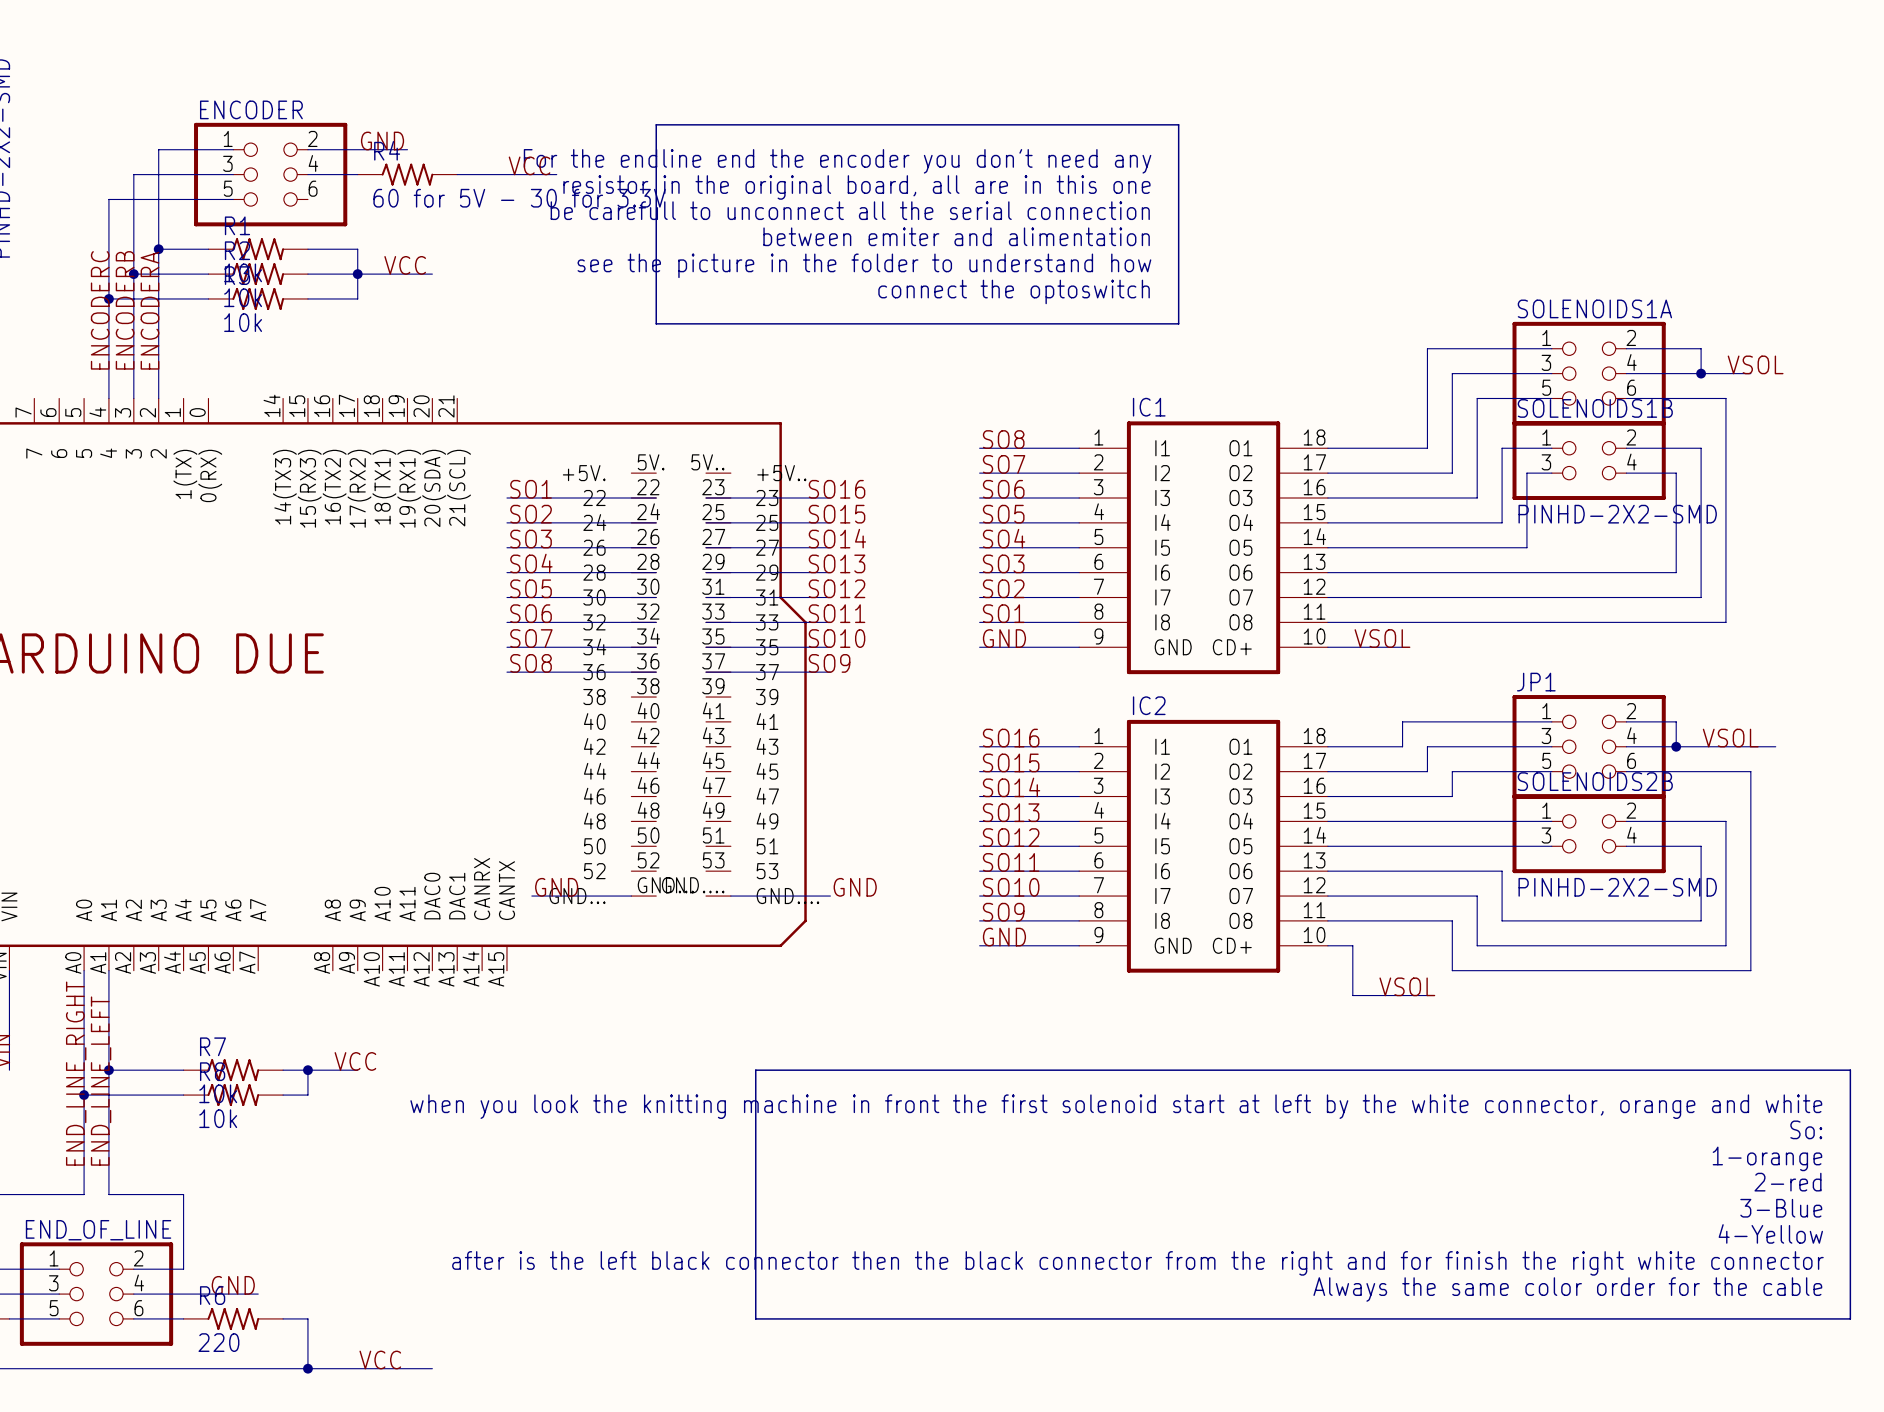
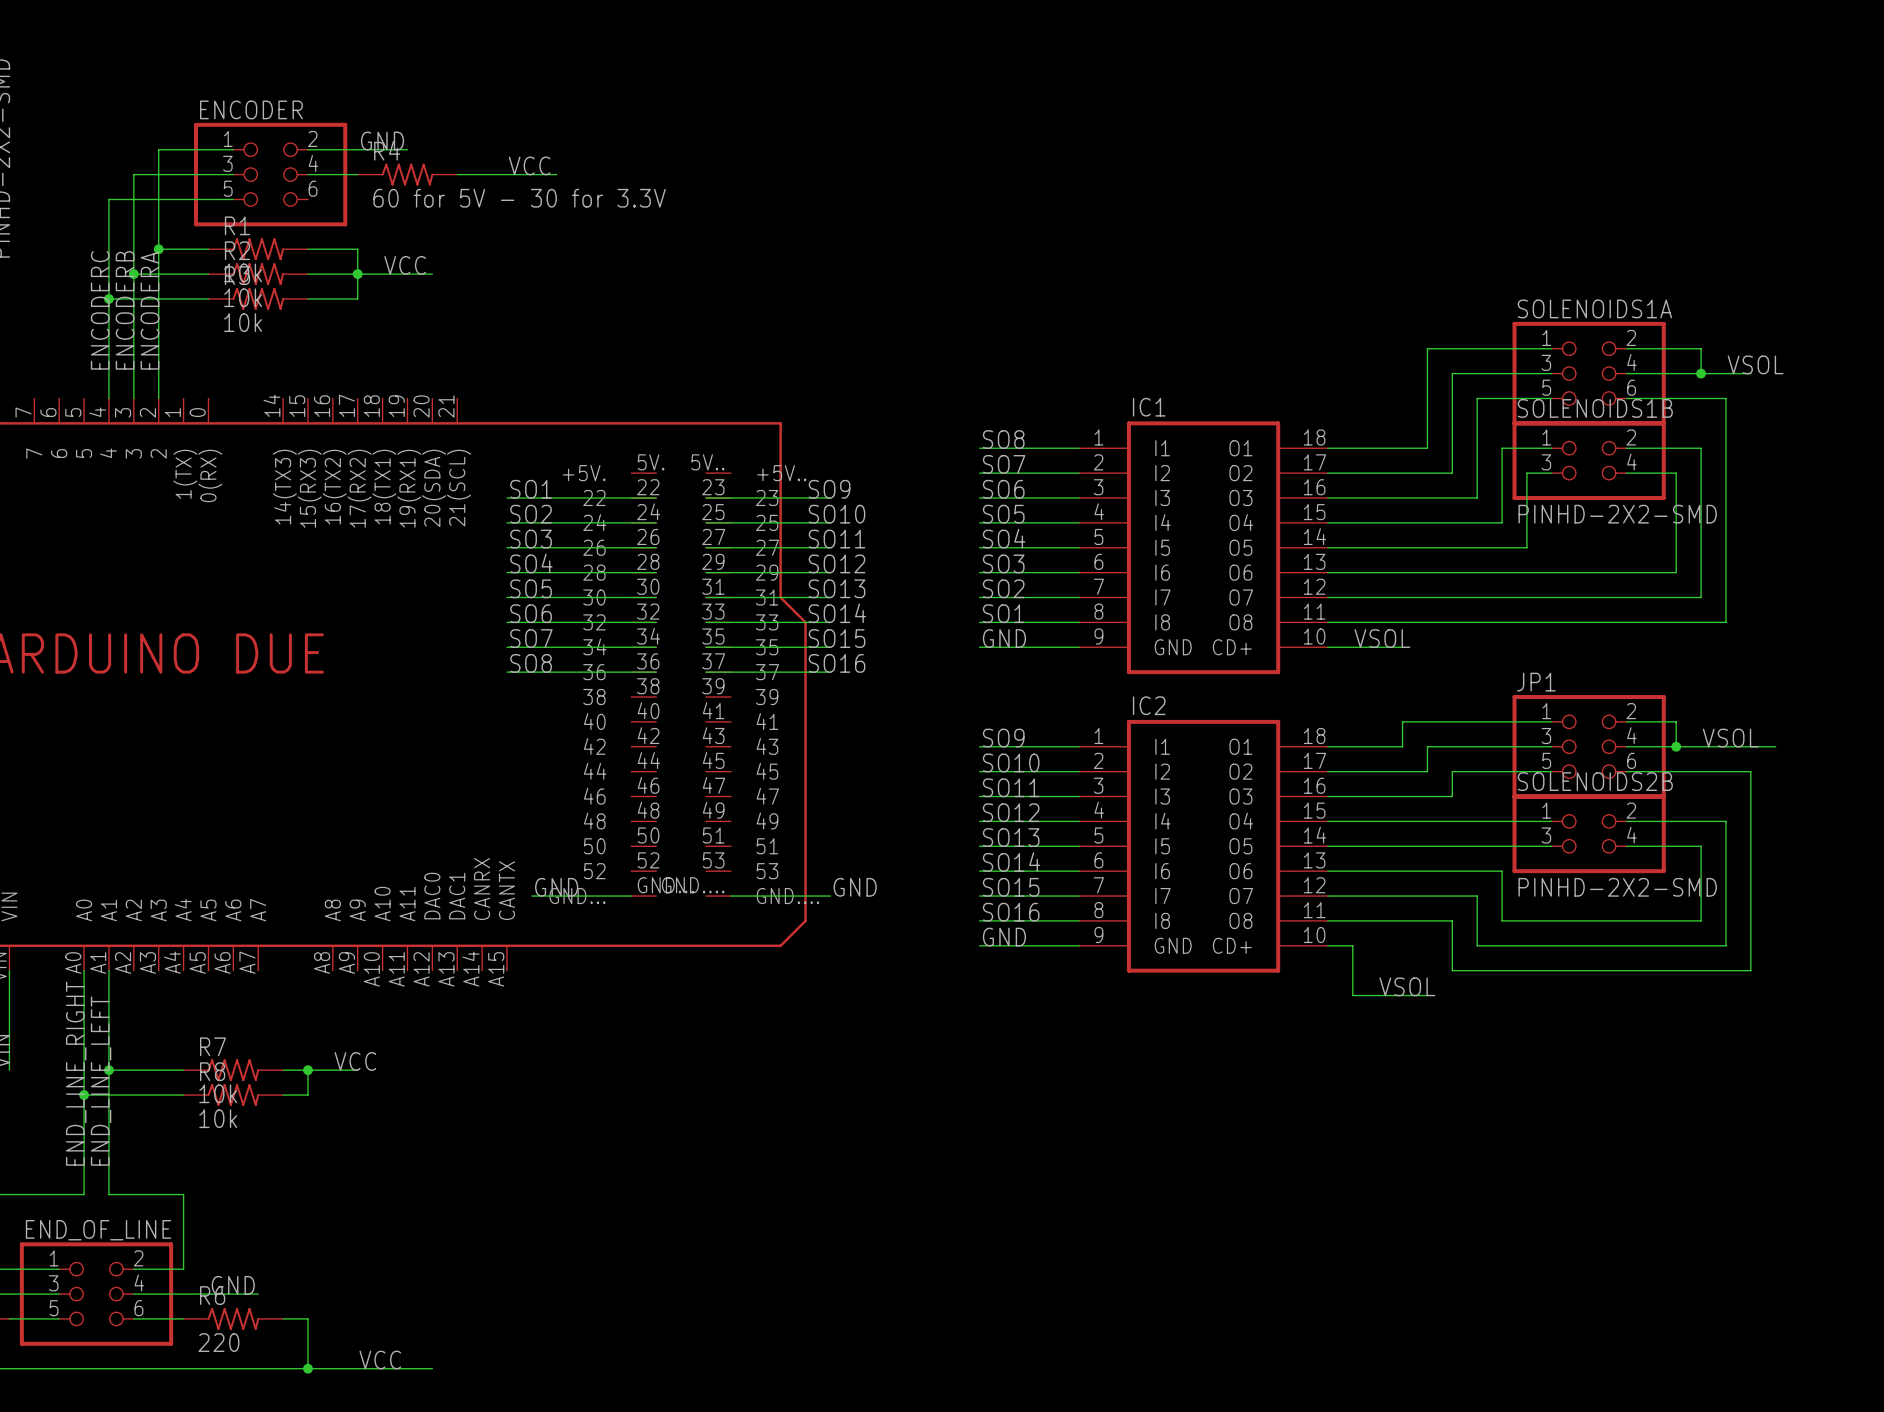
line: (656, 124) (1178, 124) (1178, 323) (656, 323) (656, 124) -> none
text: For the endline end the encoder you don't need any (837, 161) -> none
text: resistor in the original board, all are in this one (856, 187) -> none
text: be carefull to unconnect all the serial connection (850, 210) -> none
text: between emiter and alimentation (956, 236) -> none
text: see the picture in the folder to understand how (864, 265) -> none
text: connect the optoswitch (1014, 291) -> none
label: SO16 (837, 489) -> SO9 (829, 489)
label: SO15 (837, 514) -> SO10 (837, 514)
label: SO14 (837, 538) -> SO11 (837, 539)
label: SO13 (837, 563) -> SO12 (837, 563)
label: SO12 (837, 588) -> SO13 (837, 588)
label: SO11 (837, 613) -> SO14 (837, 613)
label: SO10 (837, 638) -> SO15 (837, 638)
label: SO9 (829, 663) -> SO16 (837, 663)
label: SO16 (1011, 738) -> SO9 (1003, 738)
label: SO15 (1011, 762) -> SO10 (1011, 762)
label: SO14 (1011, 787) -> SO11 (1011, 787)
label: SO13 (1011, 812) -> SO12 (1011, 812)
label: SO12 (1011, 837) -> SO13 (1011, 837)
label: SO11 (1011, 862) -> SO14 (1011, 862)
label: SO10 (1011, 887) -> SO15 (1011, 887)
label: SO9 (1003, 912) -> SO16 (1011, 912)
line: (755, 1070) (1850, 1070) (1850, 1318) (755, 1318) (755, 1070) -> none
text: when you look the knitting machine in front the first solenoid start at left by the white connector, orange and white (1116, 1106) -> none
text: So: (1806, 1129) -> none
text: 1-orange (1767, 1158) -> none
text: 2-red (1787, 1182) -> none
text: 3-Blue (1781, 1208) -> none
text: 4-Yellow (1770, 1233) -> none
text: after is the left black connector then the black connector from the right and for finish the right white connector (1137, 1263) -> none
text: Always the same color order for the cable (1567, 1289) -> none

